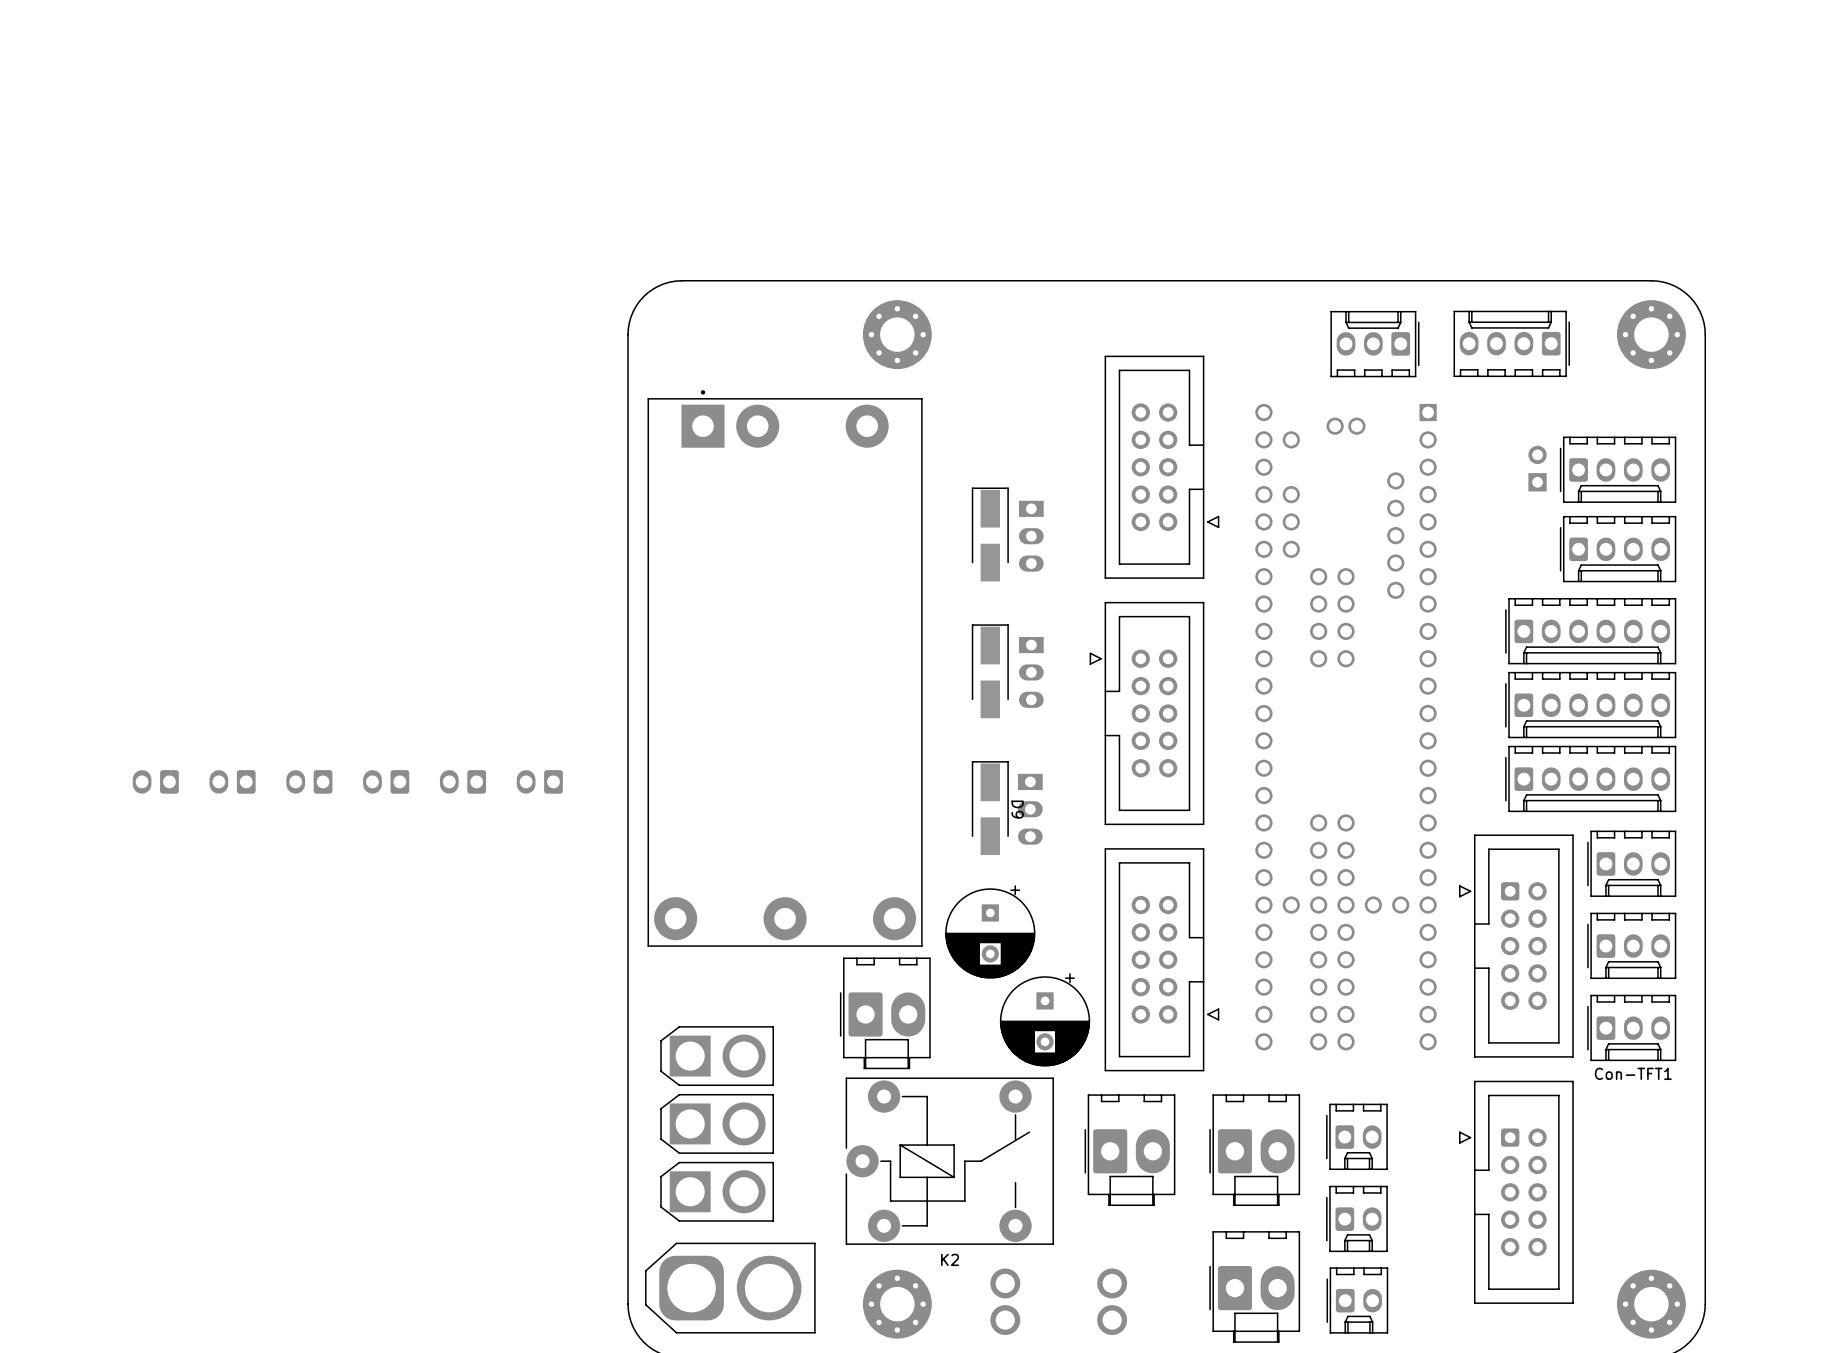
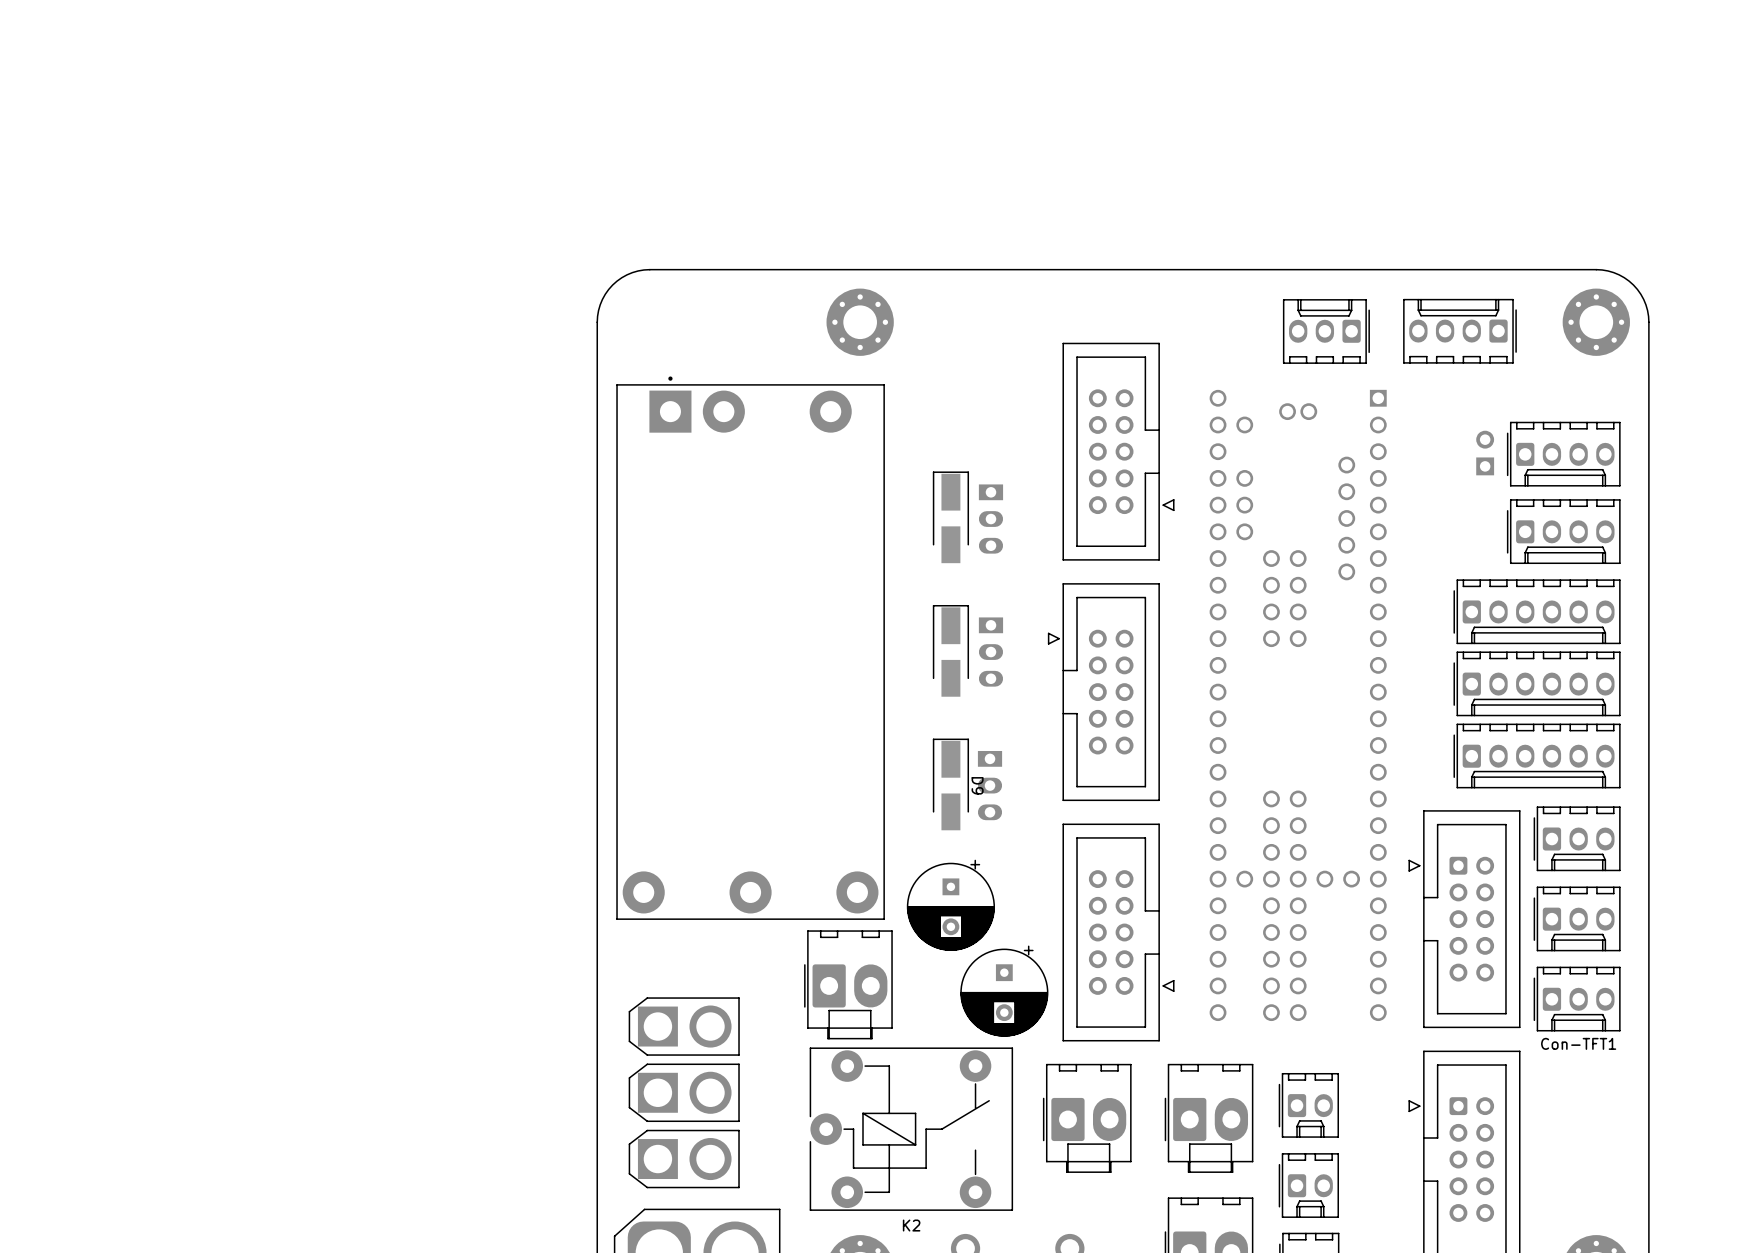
part: (155, 781) -> none
part: (232, 781) -> none
part: (309, 781) -> none
part: (386, 781) -> none
part: (462, 781) -> none
part: (539, 781) -> none

